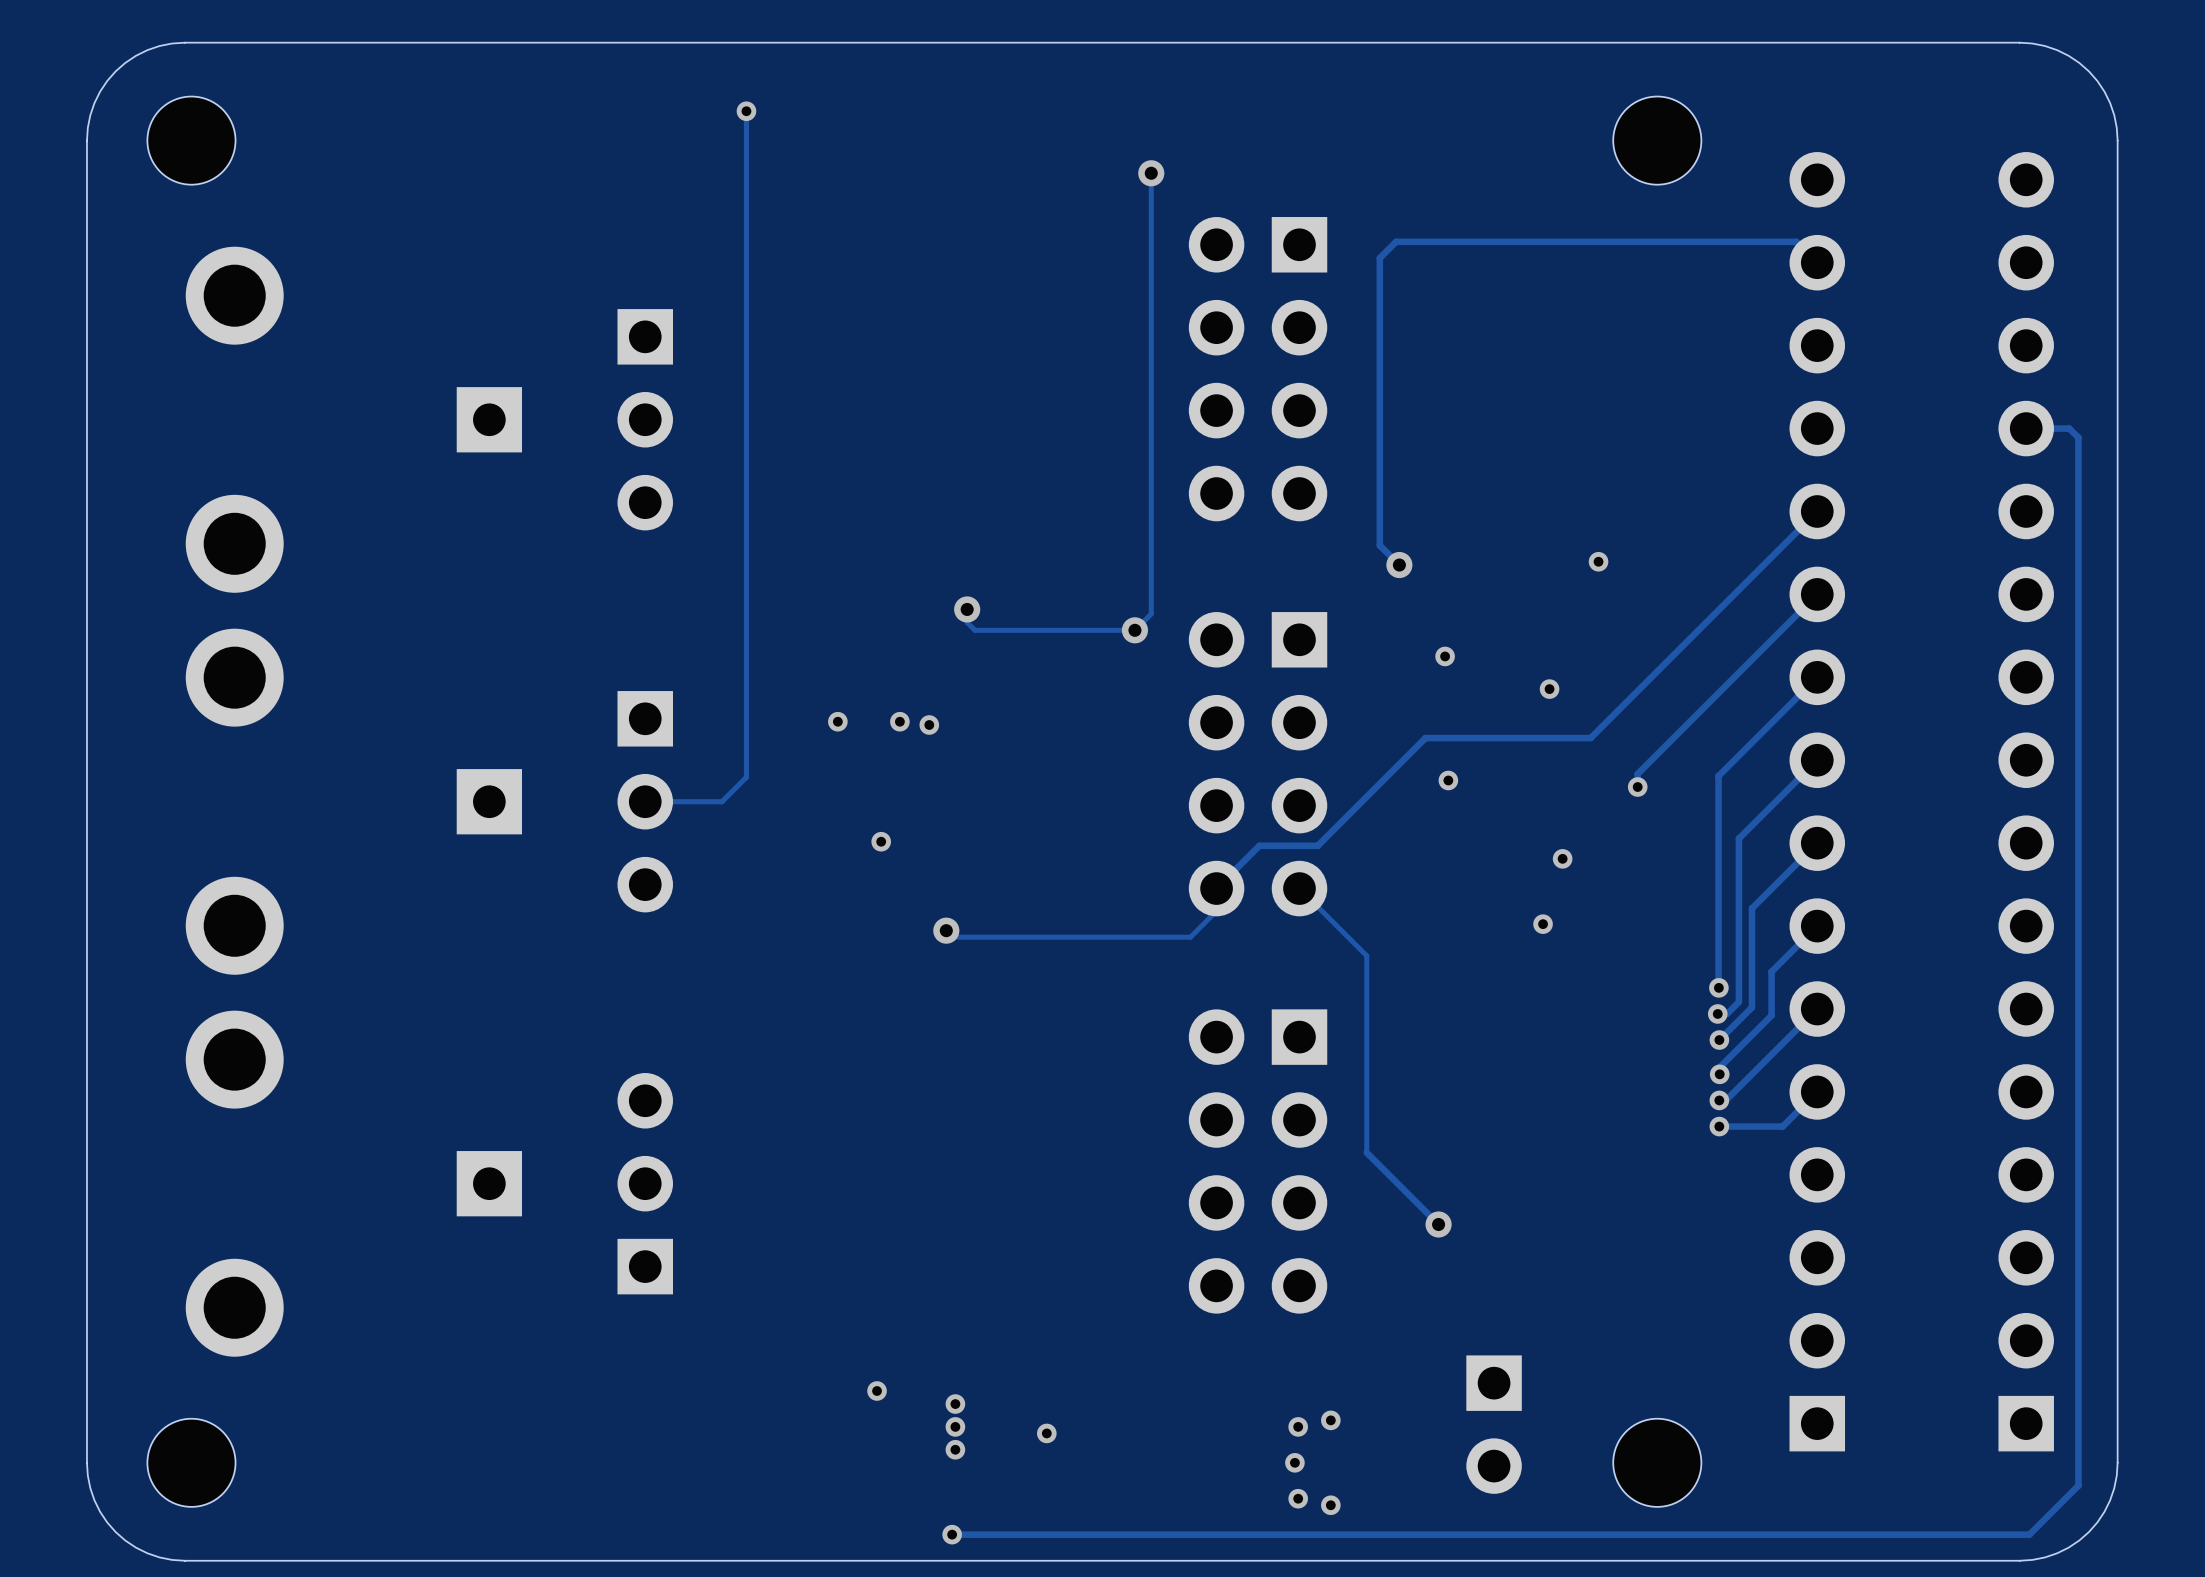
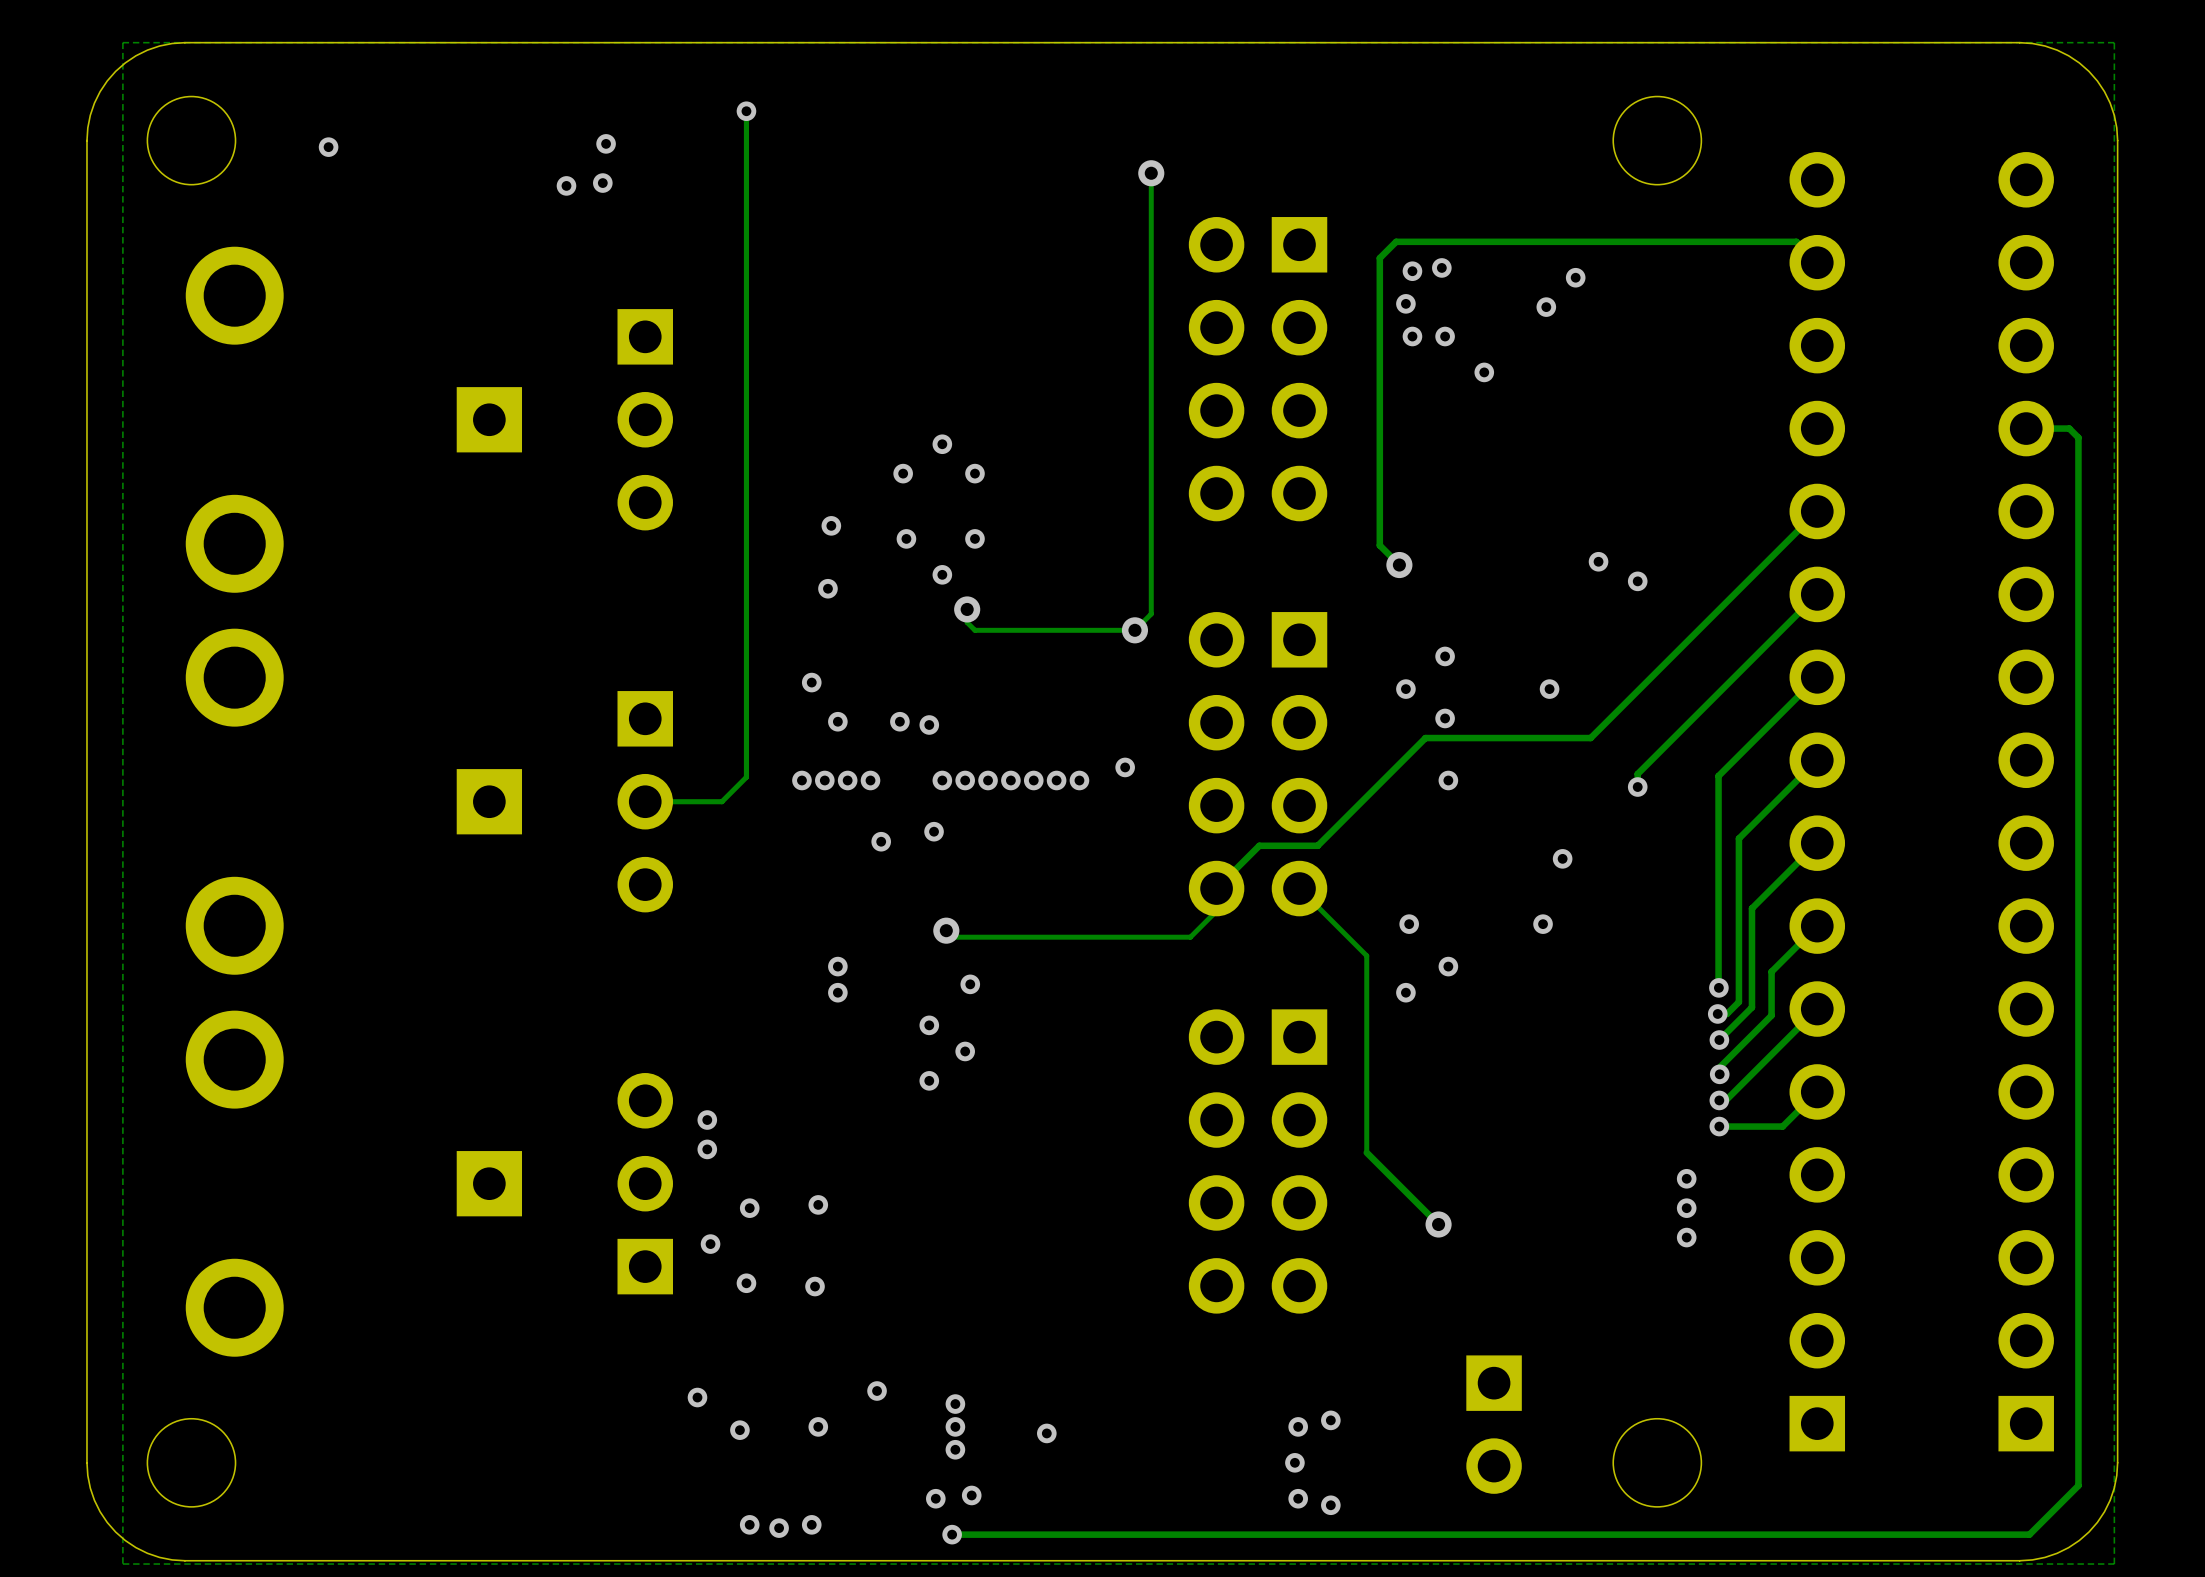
zone outline: none -> (2114, 42) (122, 42) (122, 1564) (2114, 1564) (2114, 42)
via: none -> (606, 143)
via: none -> (328, 147)
via: none -> (602, 183)
via: none -> (566, 185)
via: none -> (1441, 267)
via: none -> (1412, 271)
via: none -> (1575, 277)
via: none -> (1405, 303)
via: none -> (1546, 307)
via: none -> (1412, 336)
via: none -> (1445, 336)
via: none -> (1484, 372)
via: none -> (942, 444)
via: none -> (903, 473)
via: none -> (974, 473)
via: none -> (831, 525)
via: none -> (906, 538)
via: none -> (974, 538)
via: none -> (942, 574)
via: none -> (1637, 581)
via: none -> (827, 588)
via: none -> (811, 682)
via: none -> (1405, 689)
via: none -> (1445, 718)
via: none -> (1125, 767)
via: none -> (801, 780)
via: none -> (824, 780)
via: none -> (847, 780)
via: none -> (870, 780)
via: none -> (942, 780)
via: none -> (965, 780)
via: none -> (988, 780)
via: none -> (1010, 780)
via: none -> (1033, 780)
via: none -> (1056, 780)
via: none -> (1079, 780)
via: none -> (934, 831)
via: none -> (1409, 924)
via: none -> (837, 966)
via: none -> (1448, 966)
via: none -> (970, 984)
via: none -> (837, 992)
via: none -> (1405, 992)
via: none -> (929, 1025)
via: none -> (965, 1051)
via: none -> (929, 1080)
via: none -> (707, 1120)
via: none -> (707, 1149)
via: none -> (1686, 1178)
via: none -> (818, 1204)
via: none -> (749, 1208)
via: none -> (1686, 1208)
via: none -> (1686, 1237)
via: none -> (710, 1244)
via: none -> (746, 1283)
via: none -> (815, 1286)
via: none -> (697, 1397)
via: none -> (818, 1426)
via: none -> (739, 1430)
via: none -> (971, 1495)
via: none -> (935, 1498)
via: none -> (749, 1524)
via: none -> (811, 1524)
via: none -> (779, 1528)

